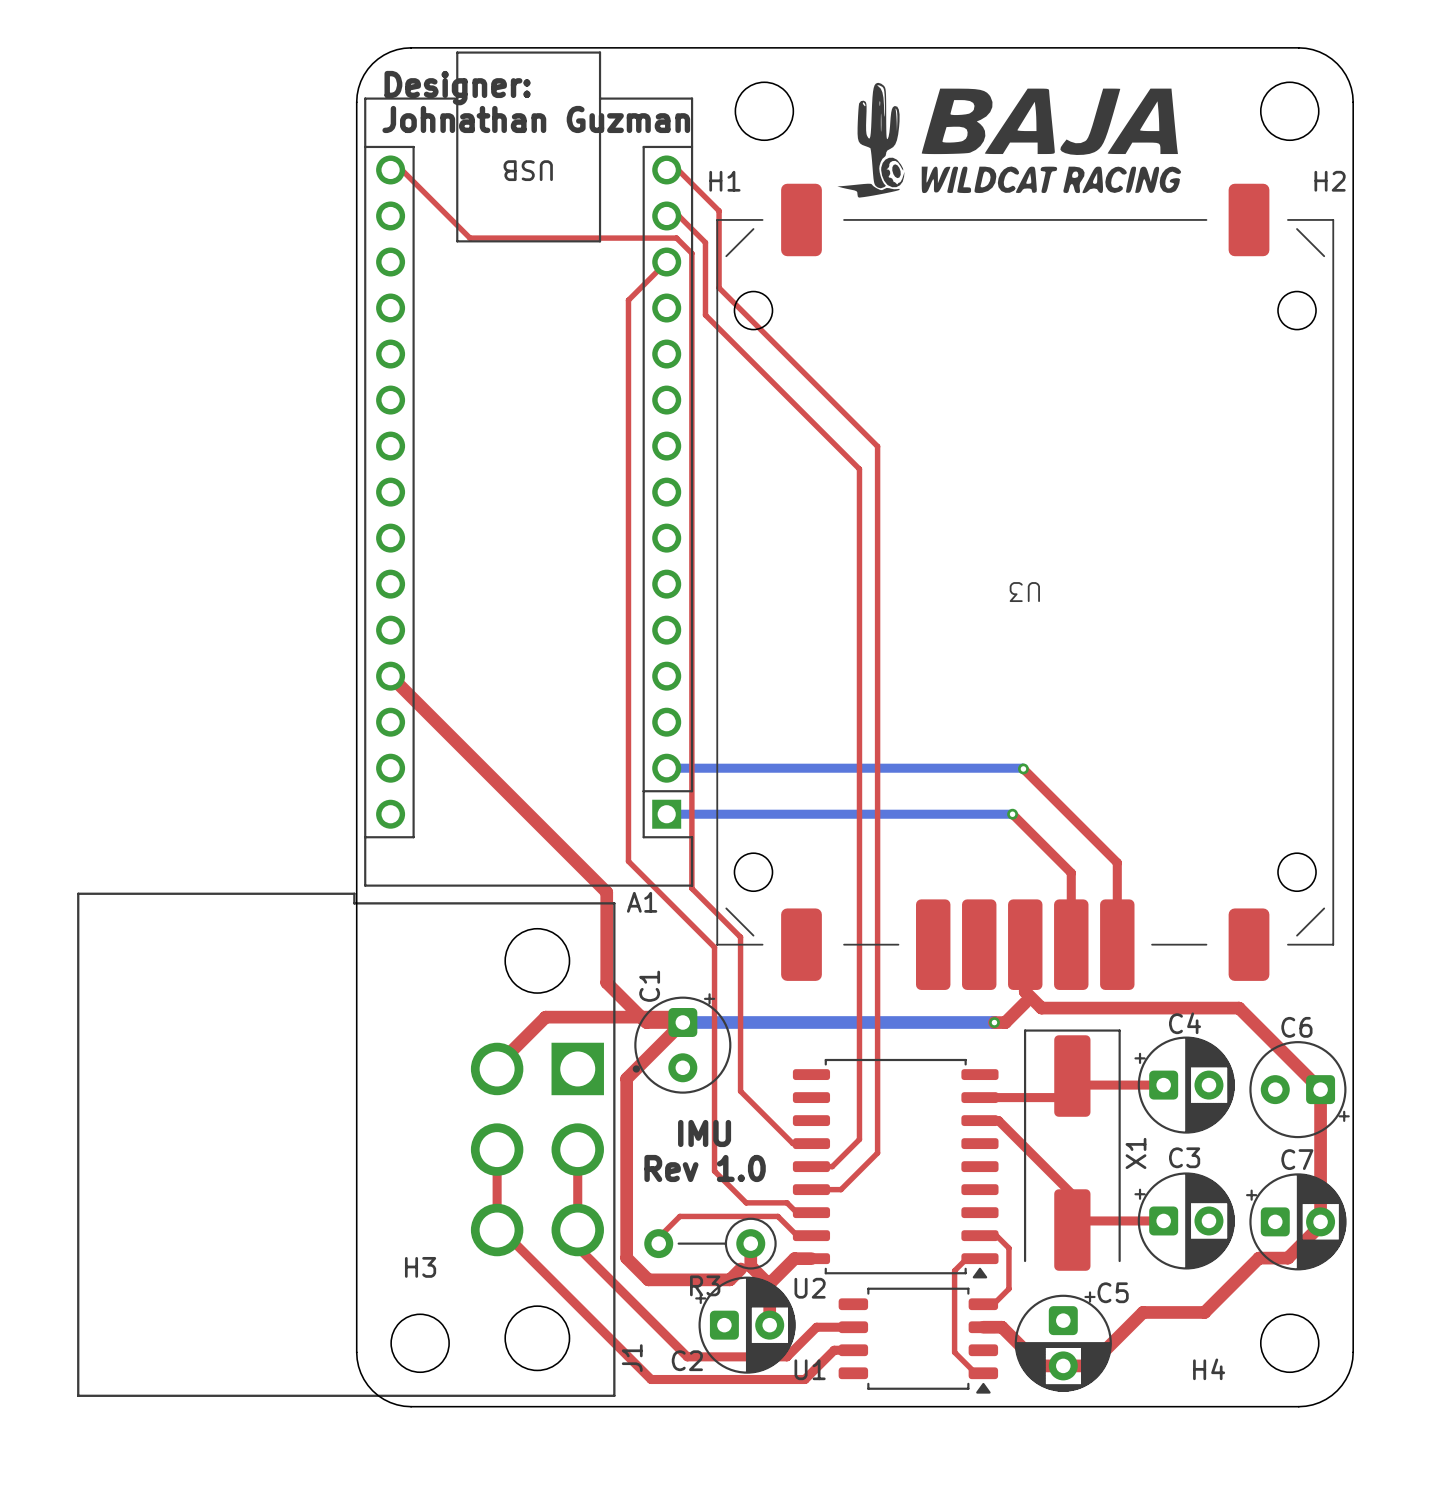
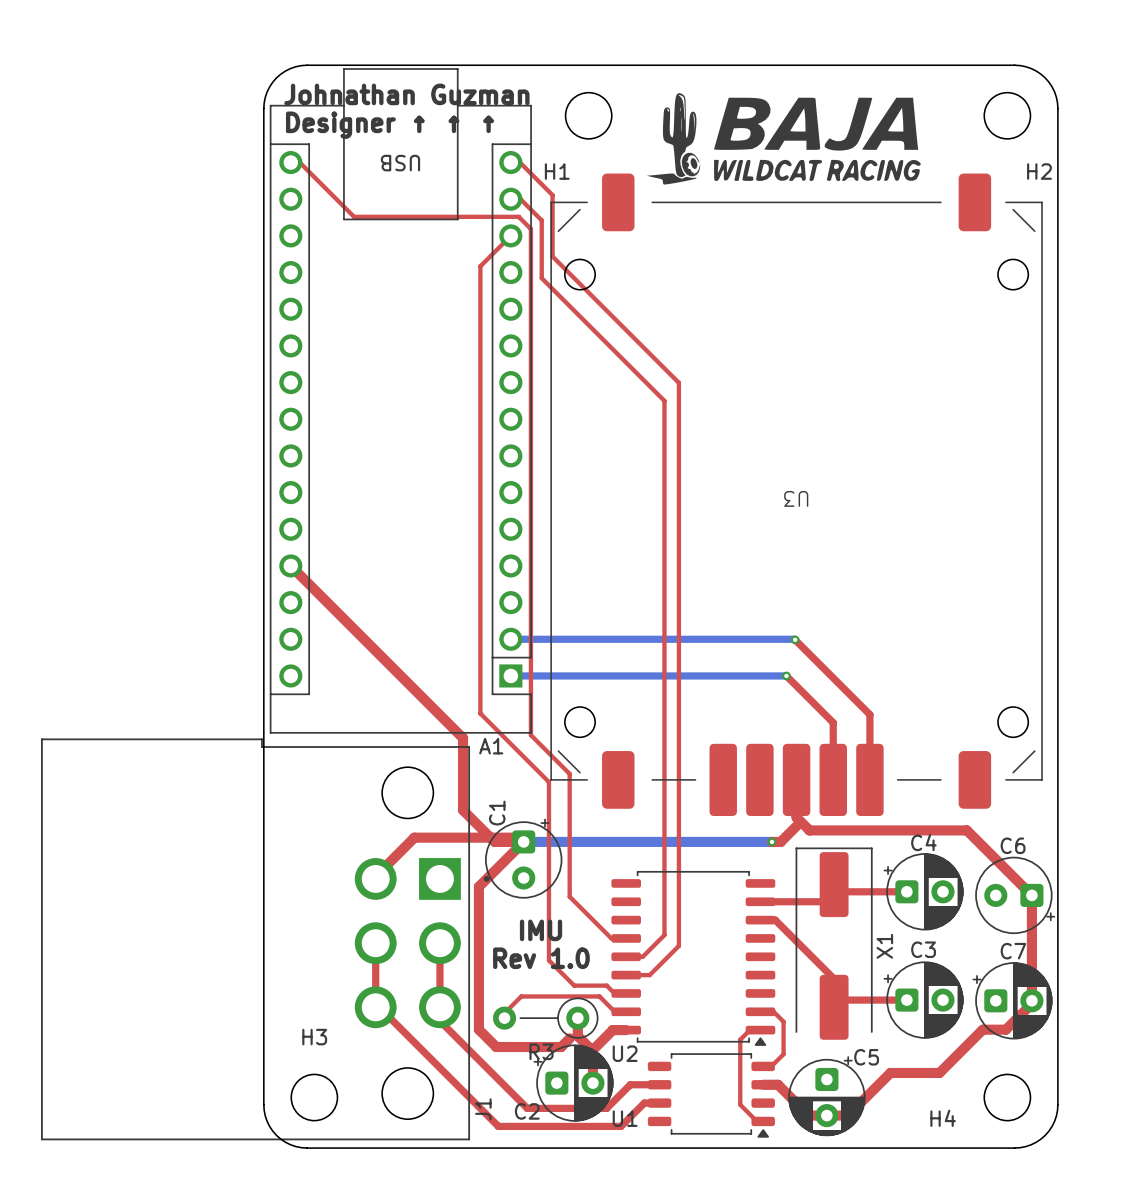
text: Designer: (457, 88) -> Johnathan Guzman (406, 94)
text: Johnathan Guzman (536, 119) -> Designer ↑ ↑ ↑ (390, 125)

